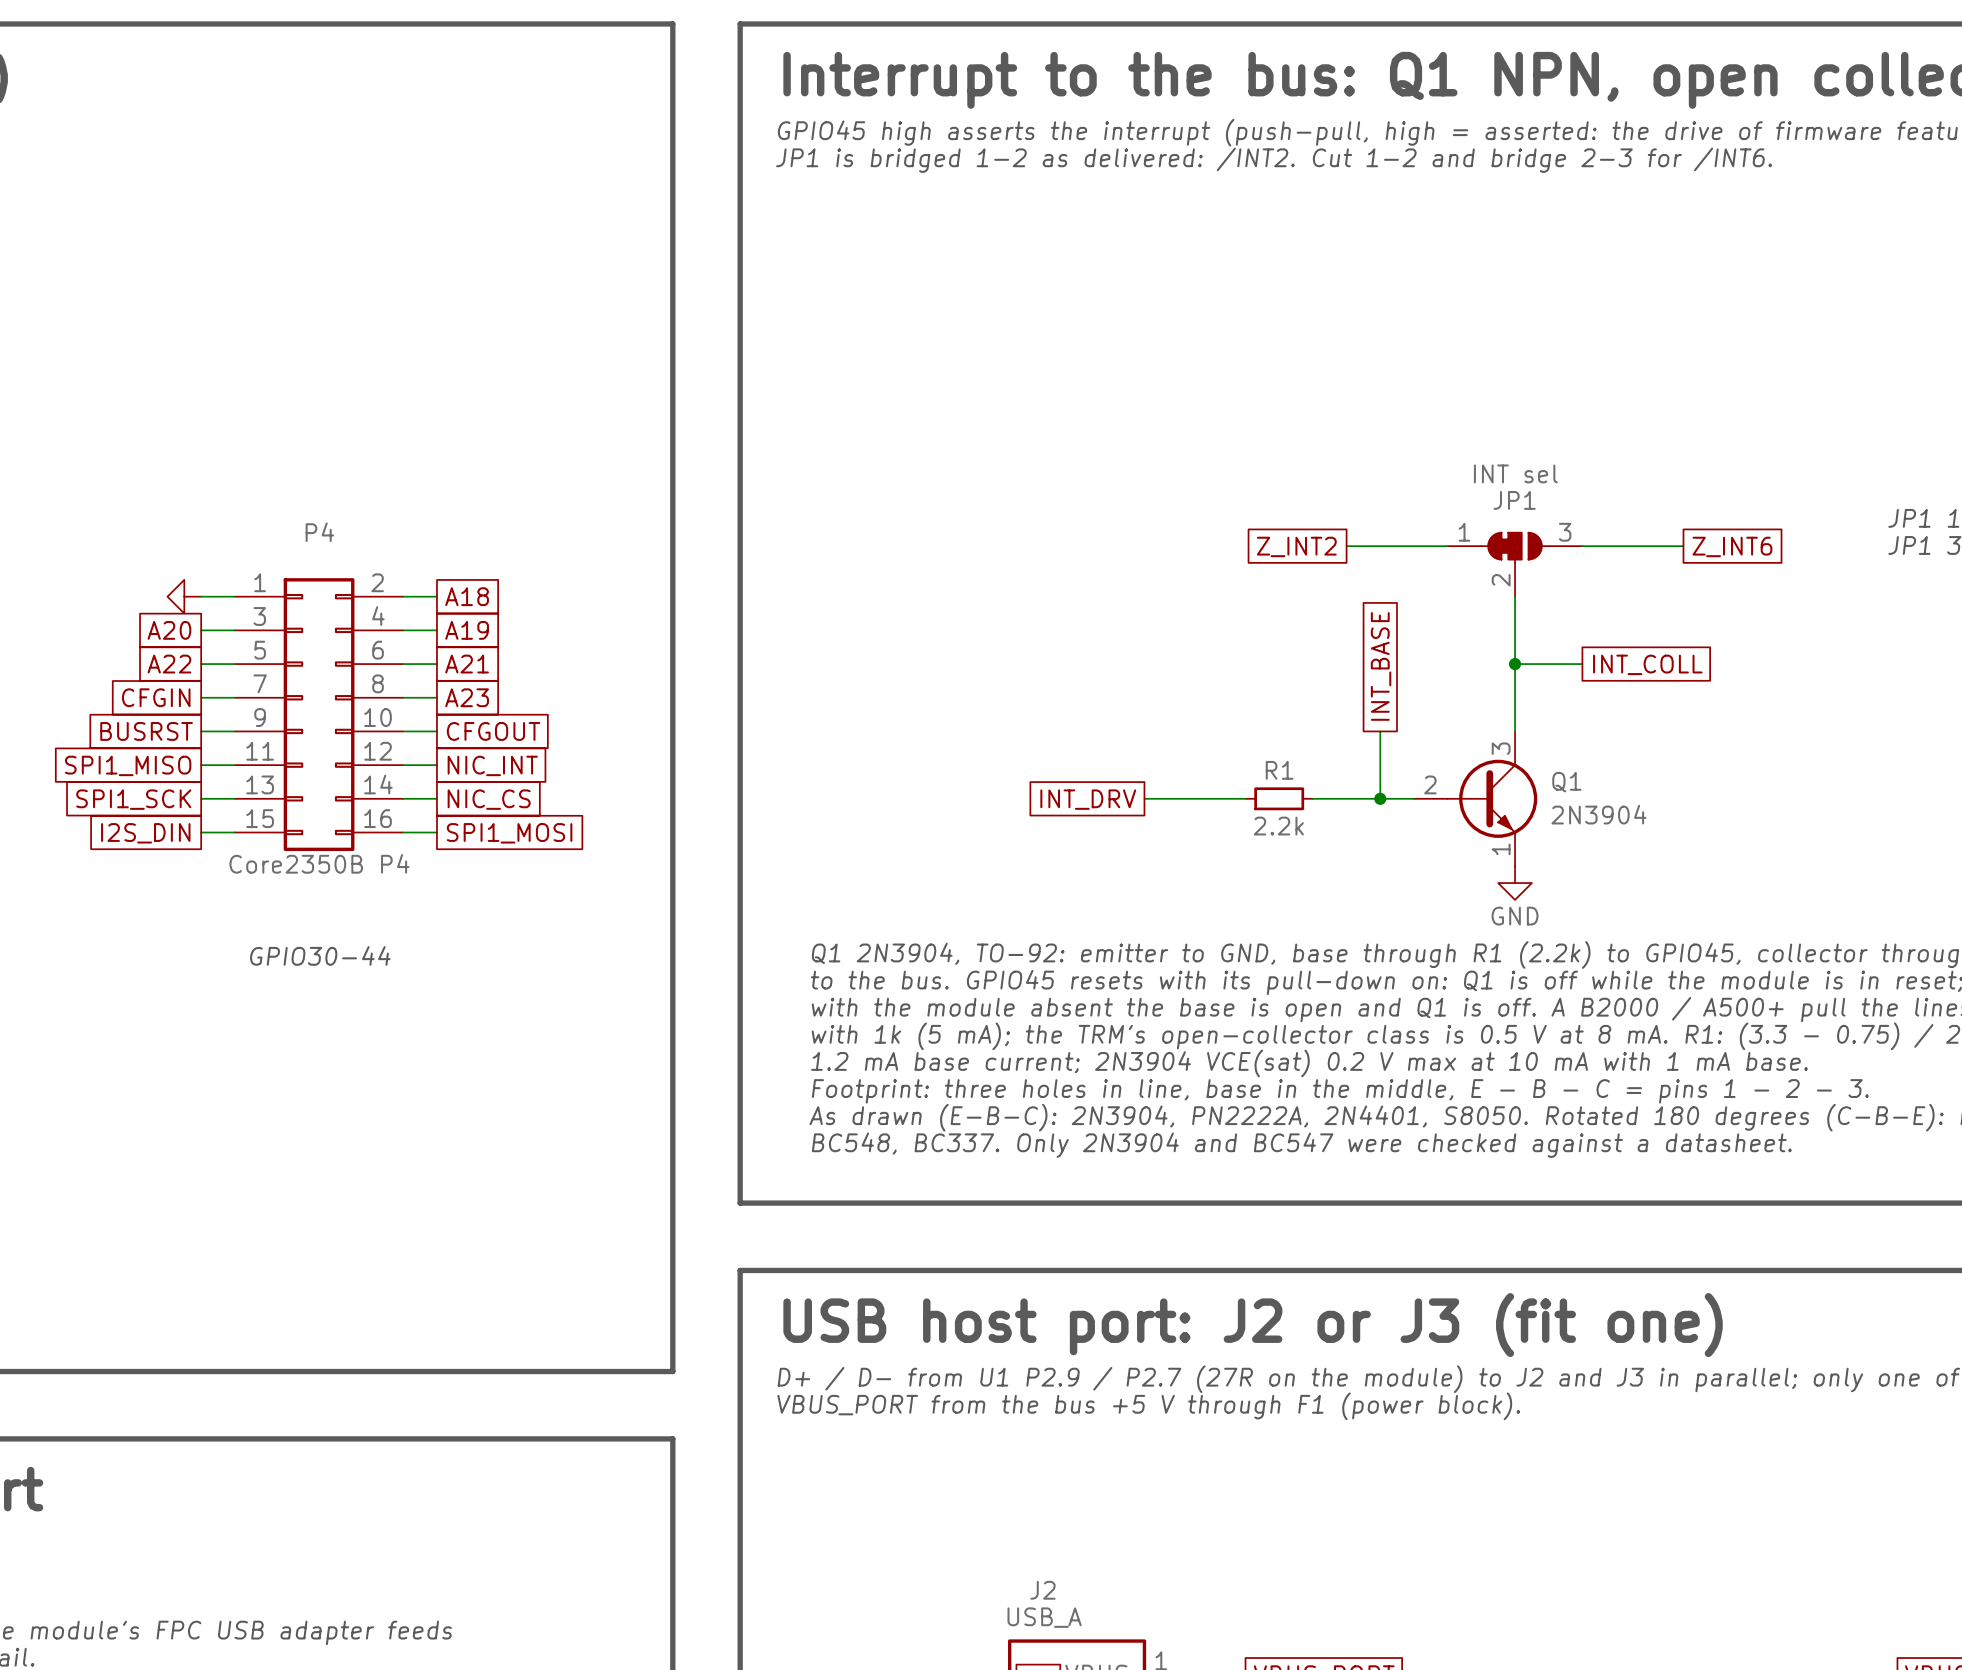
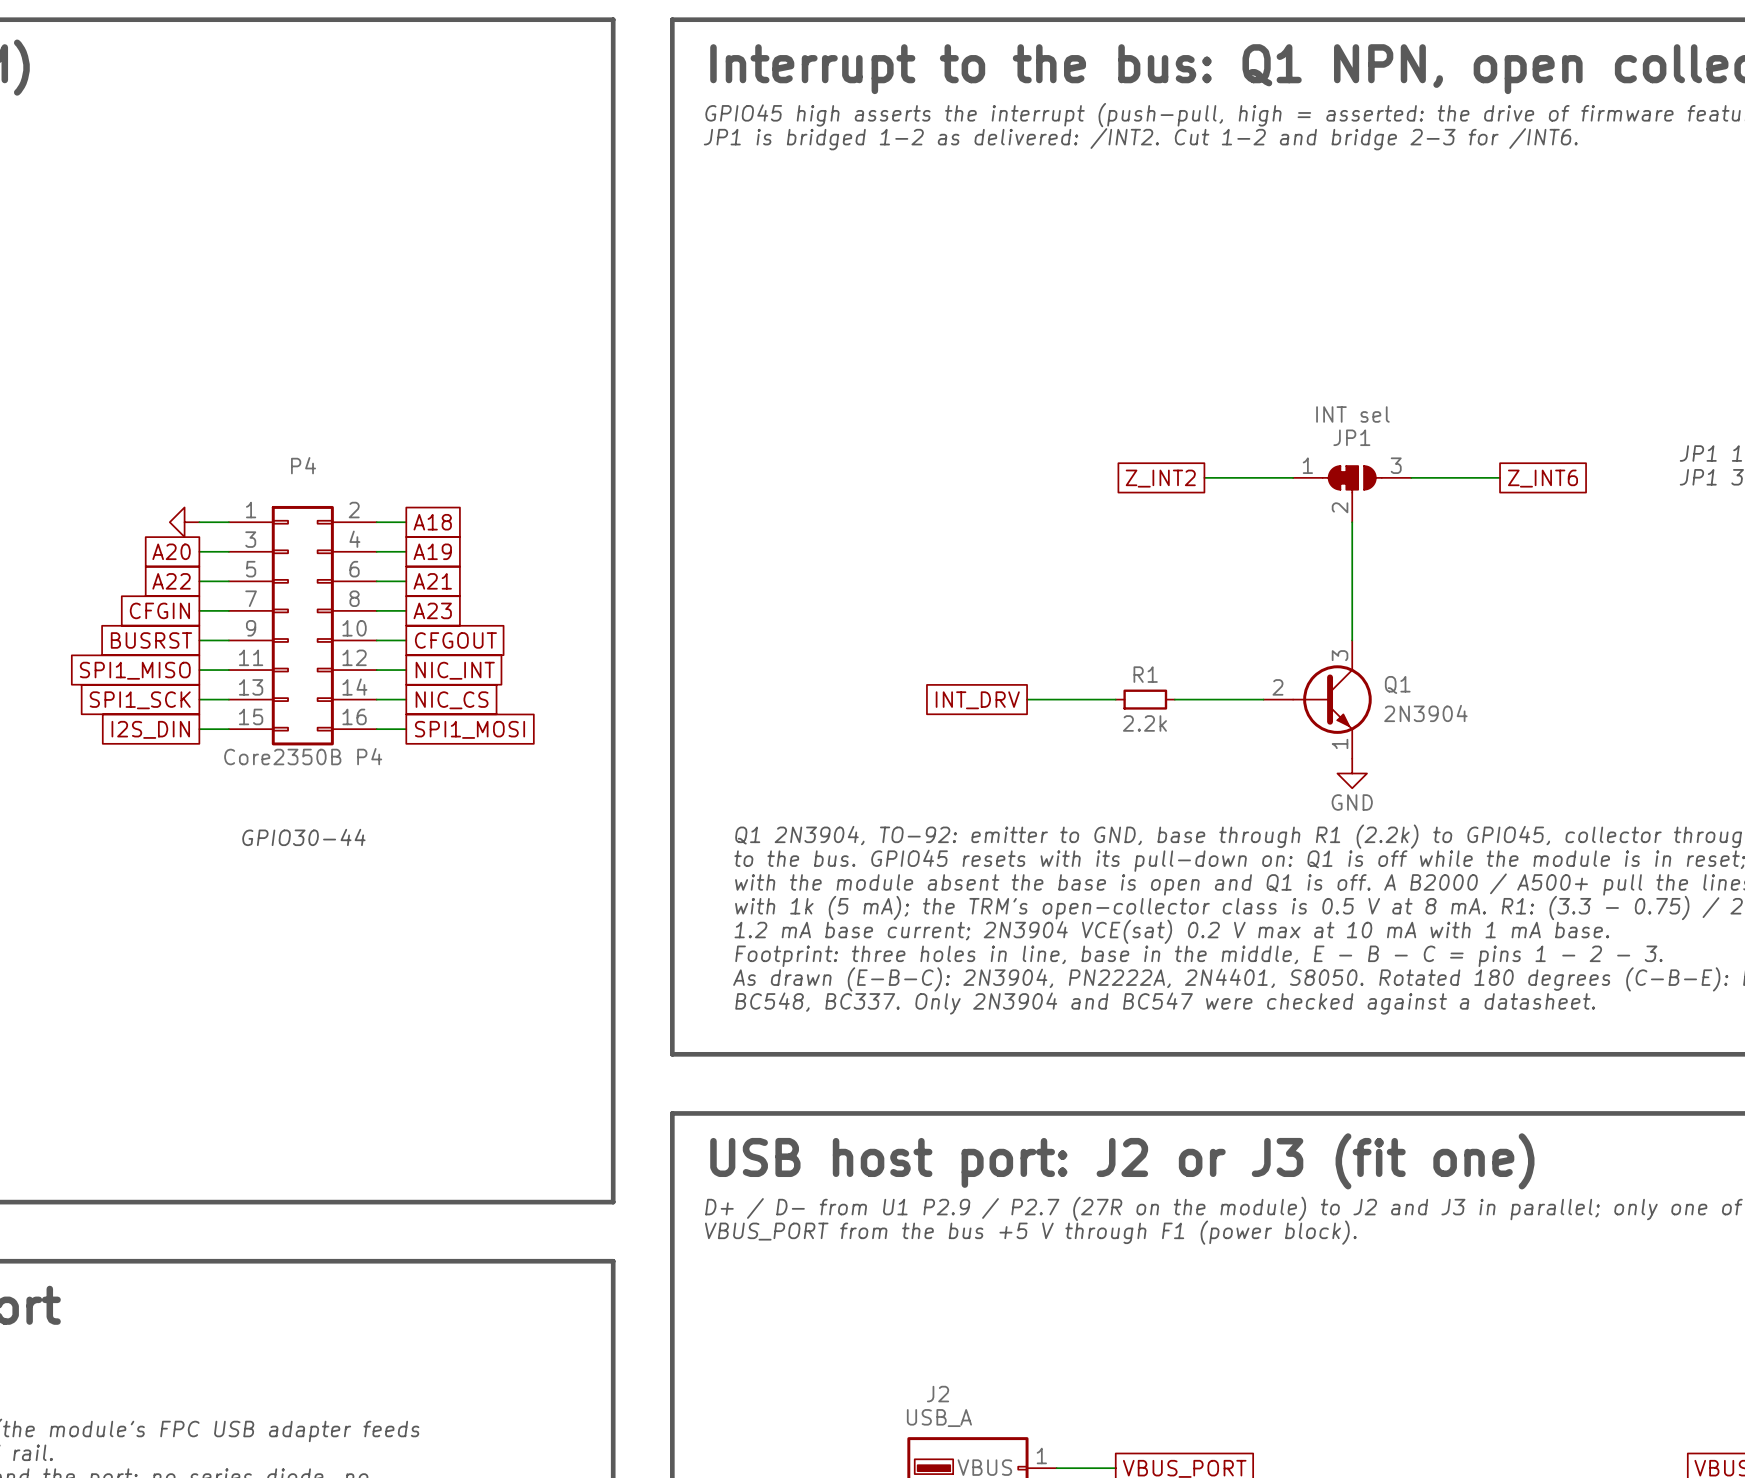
wire: (1515, 664) (1582, 664) -> none
junction: (1515, 664) -> none
global label: INT_COLL (1647, 664) -> none
global label: INT_BASE (1381, 666) -> none
wire: (1380, 731) (1380, 798) -> none
junction: (1380, 798) -> none

